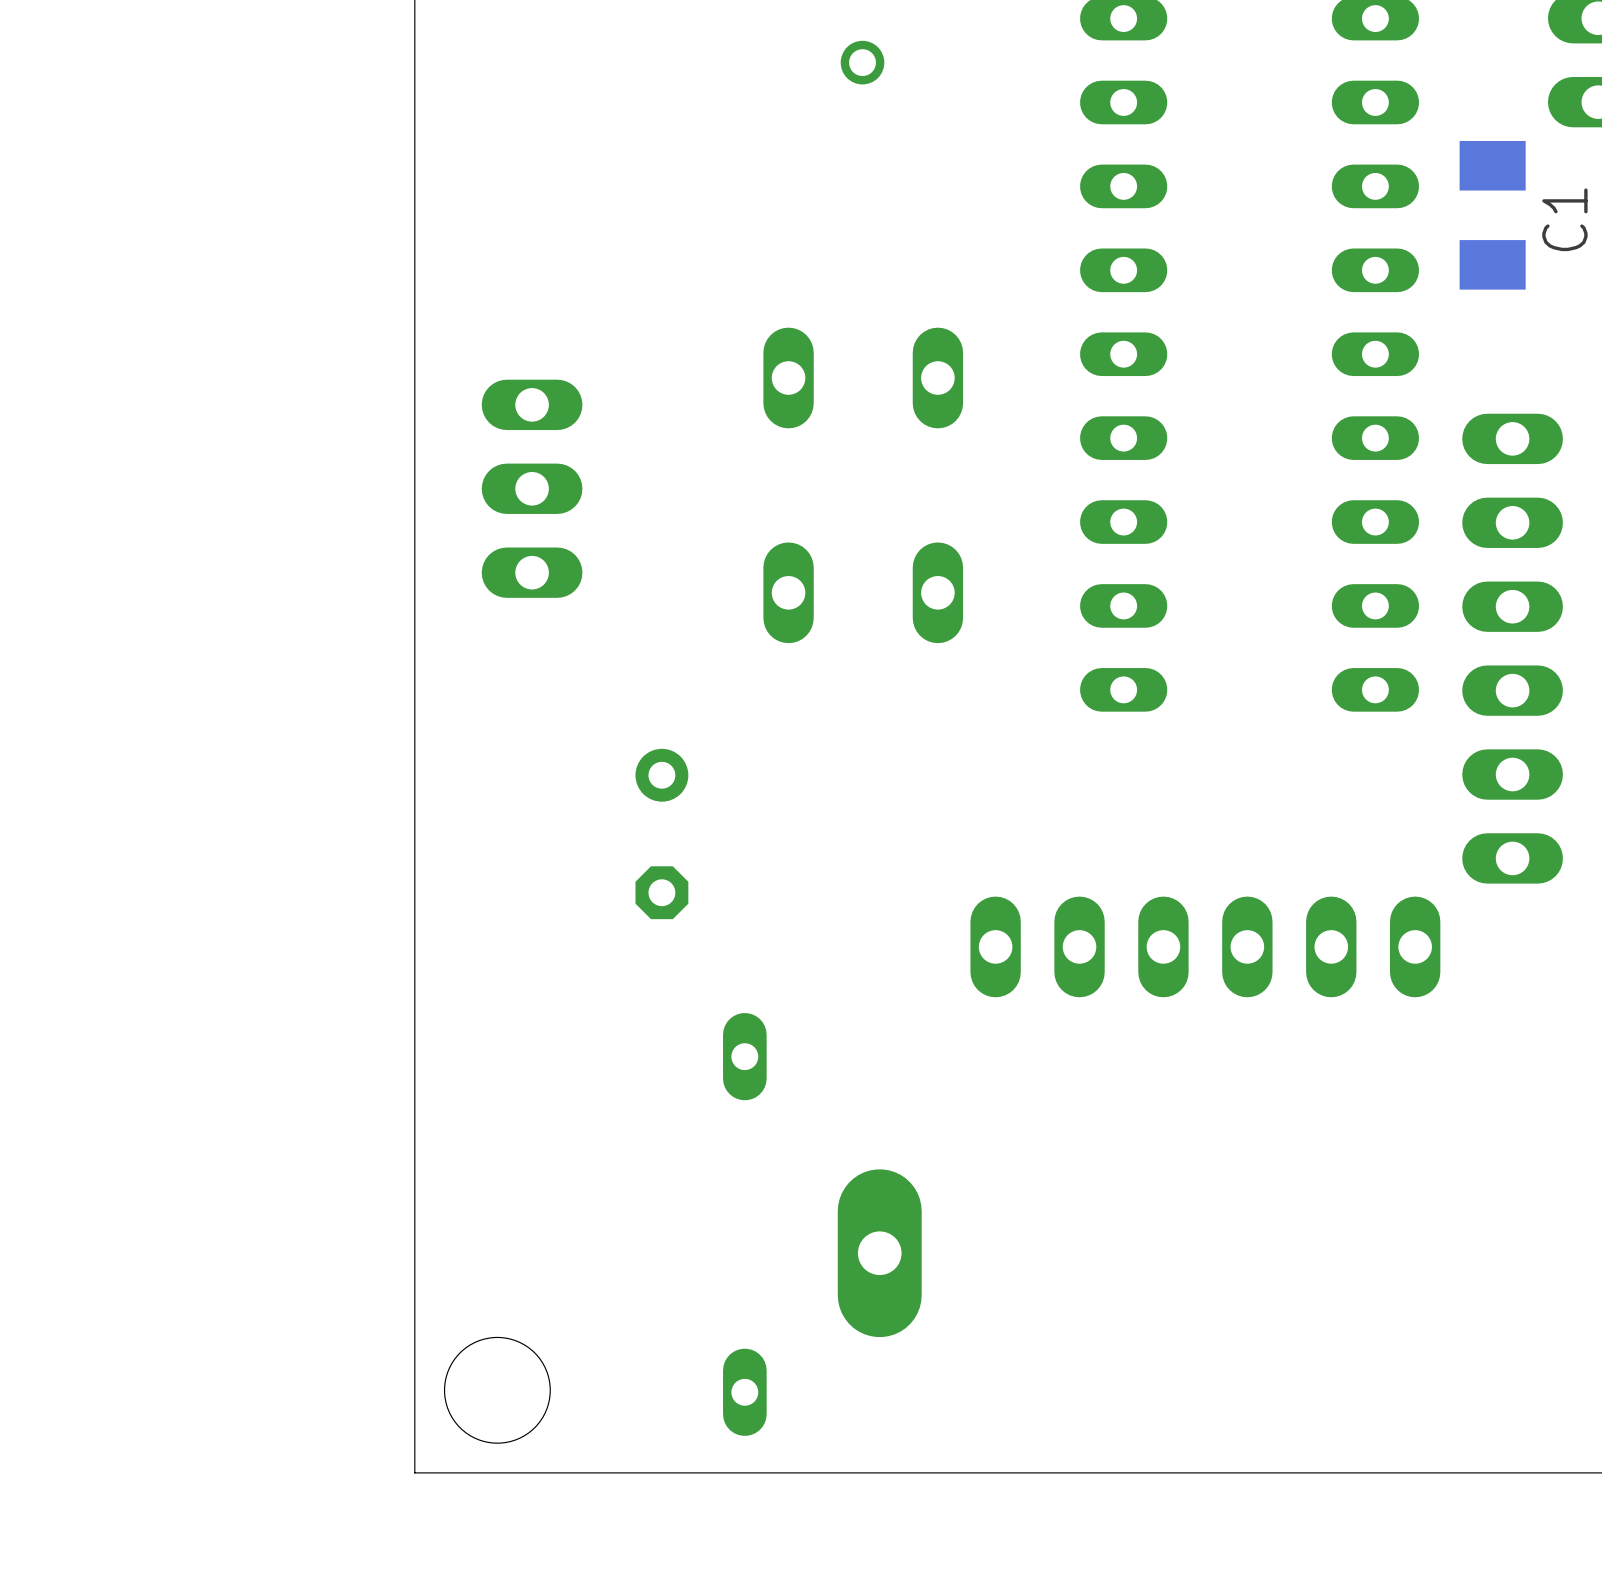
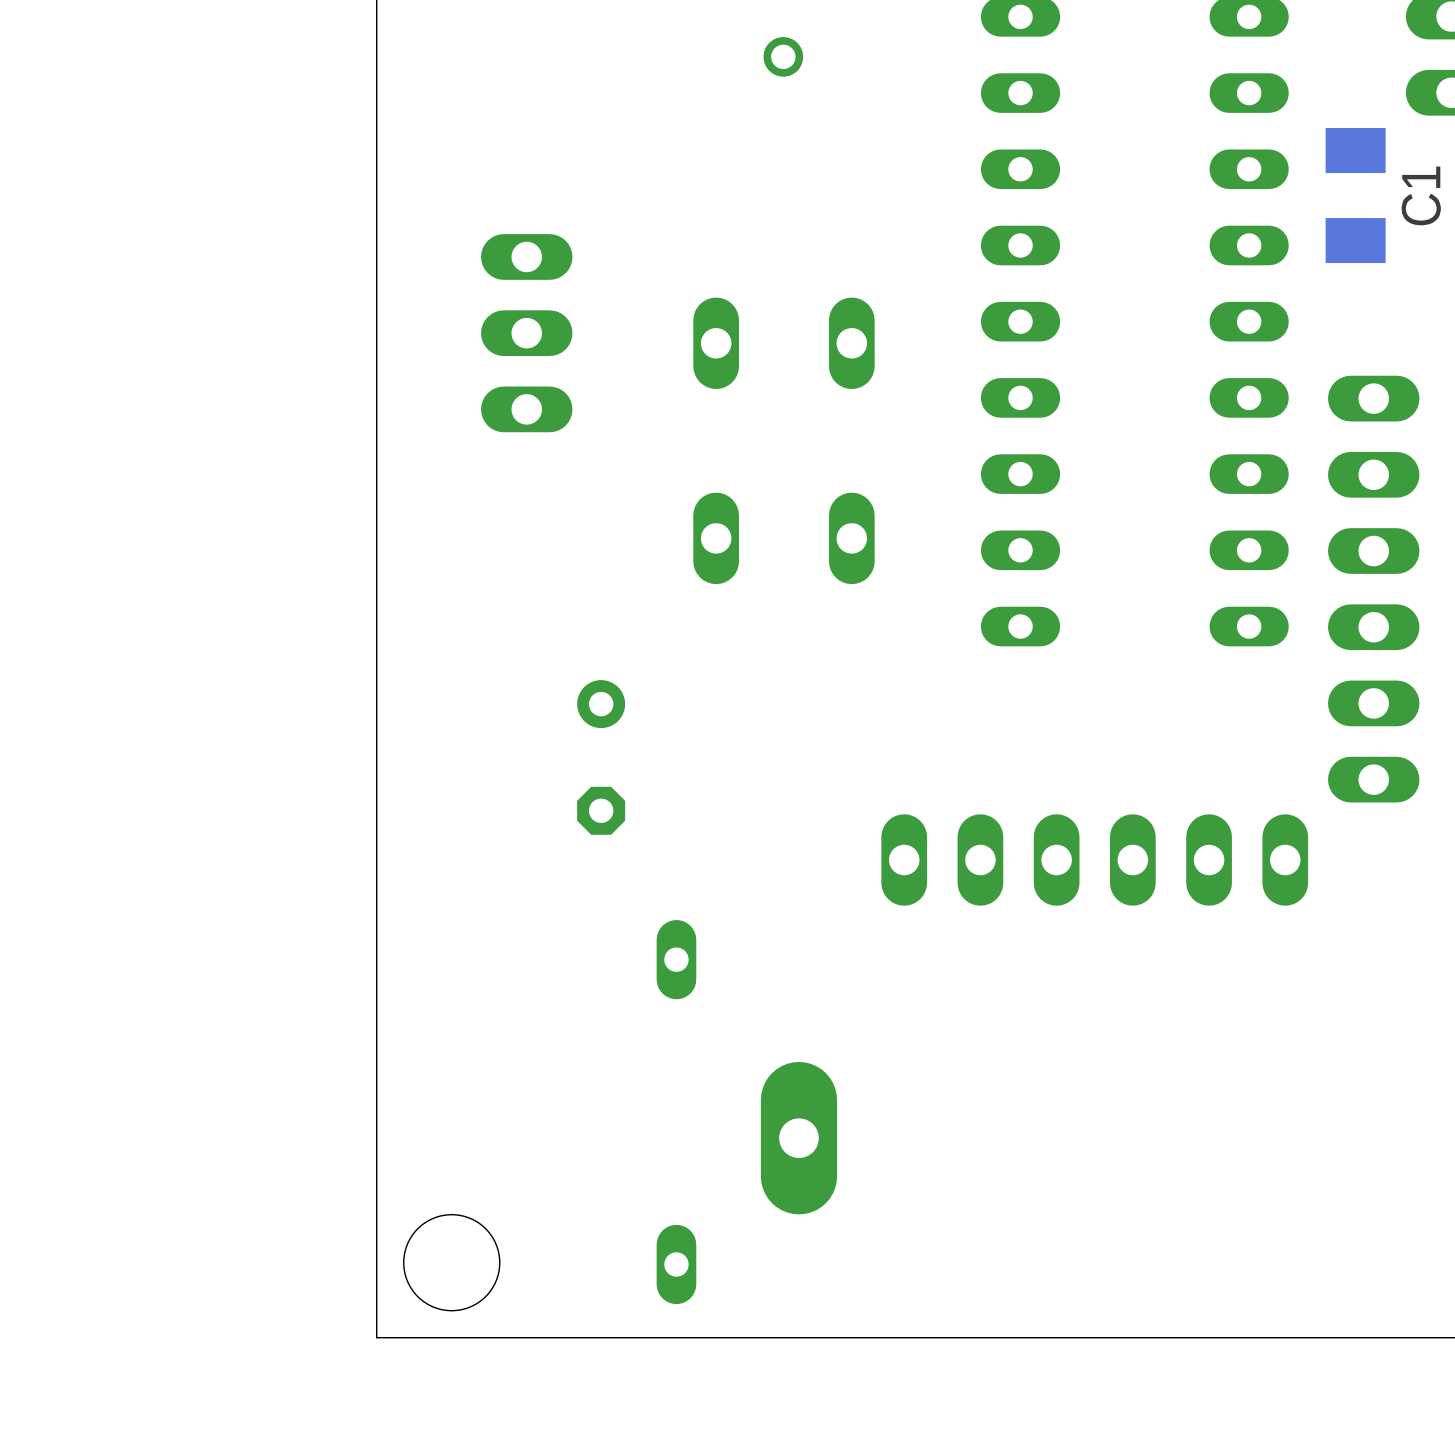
part position: (532, 488) -> (526, 333)

